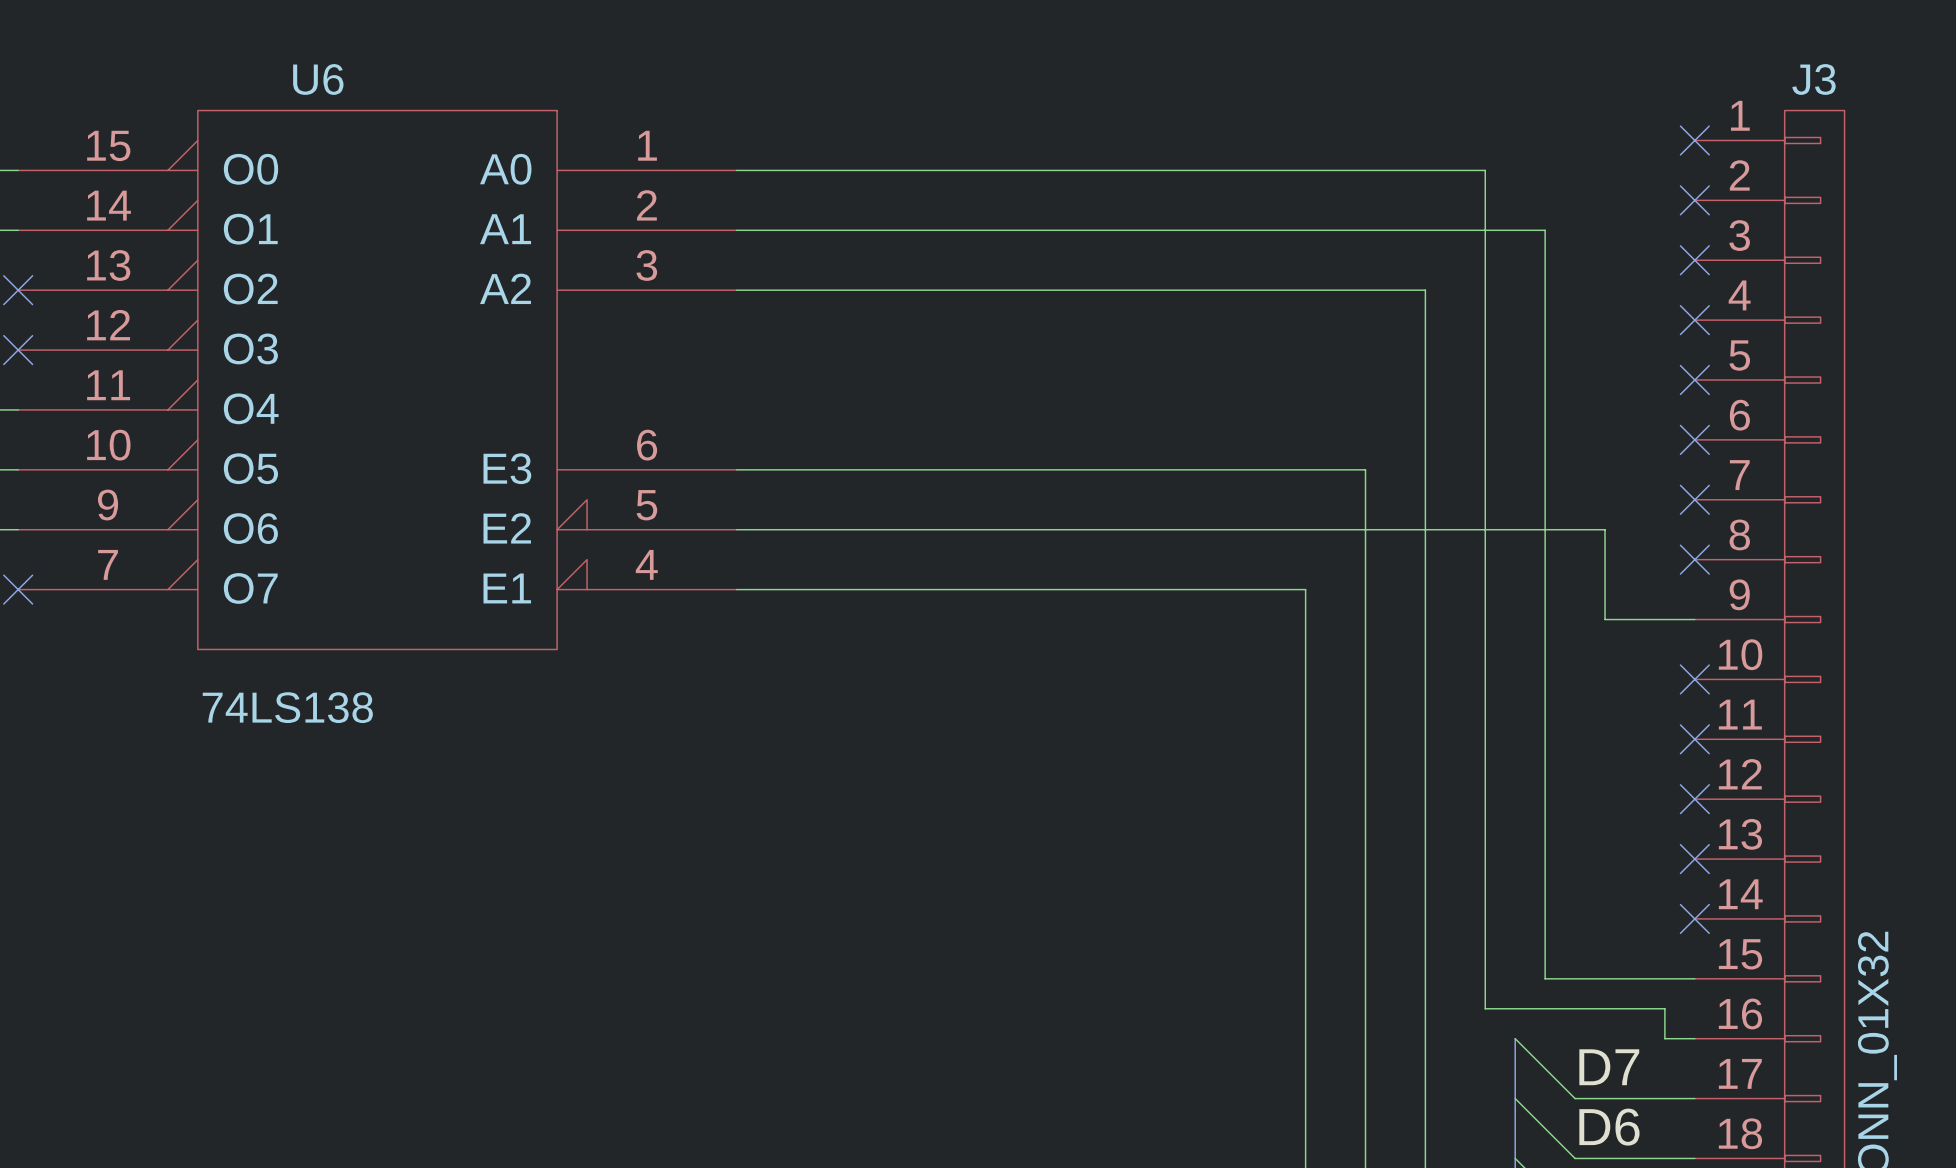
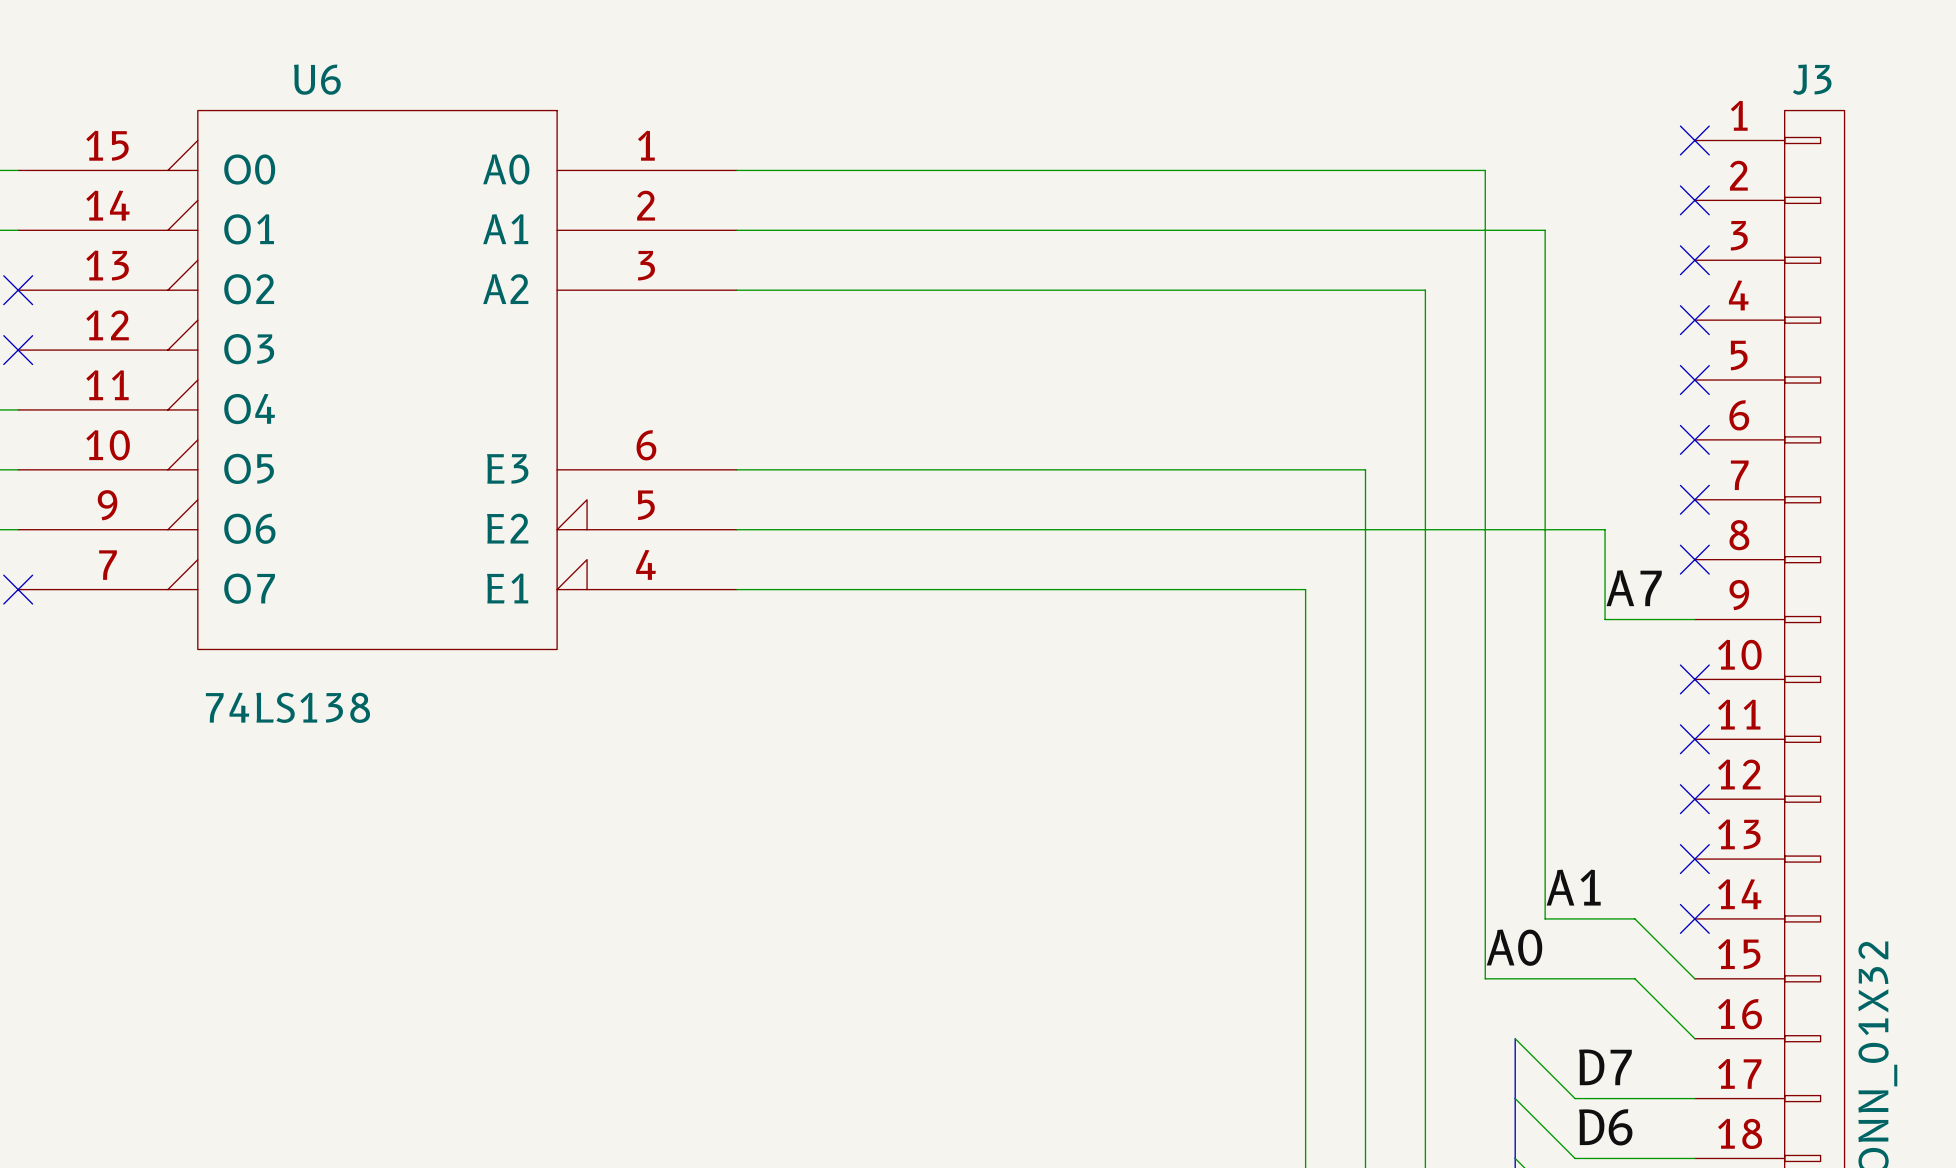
label: none -> A7 (1634, 588)
label: none -> A1 (1573, 887)
wire: (1545, 918) (1545, 978) -> (1485, 978) (1545, 978)
wire: none -> (1545, 918) (1634, 918) (1694, 978)
label: none -> A0 (1514, 947)
wire: (1485, 978) (1485, 1008) (1664, 1008) (1664, 1038) (1694, 1038) -> none
wire: (1634, 978) (1694, 978) -> (1634, 978) (1694, 1038)

